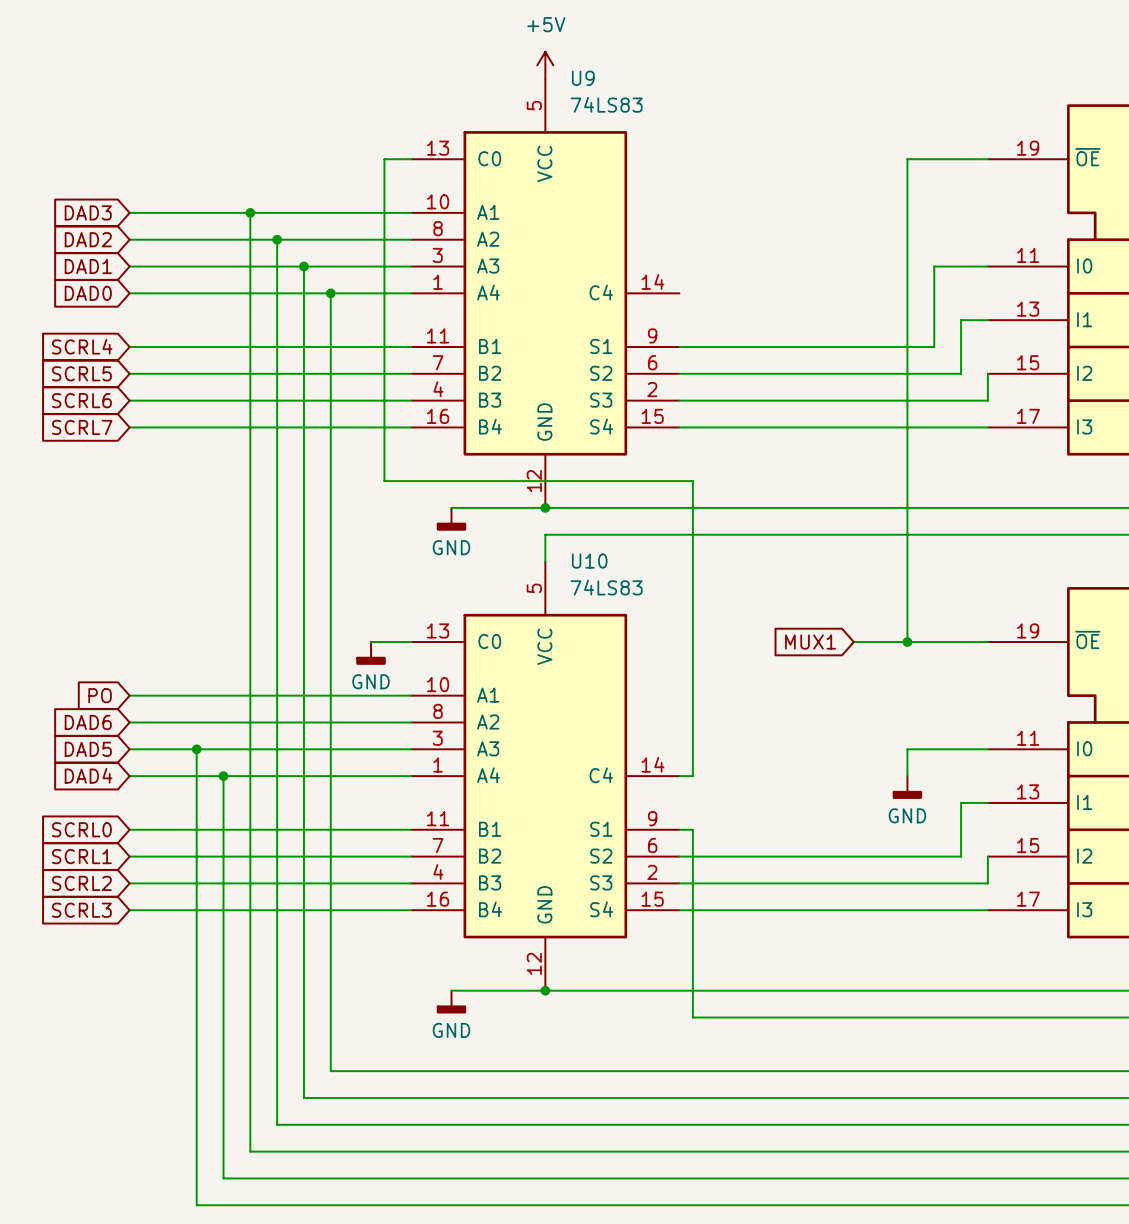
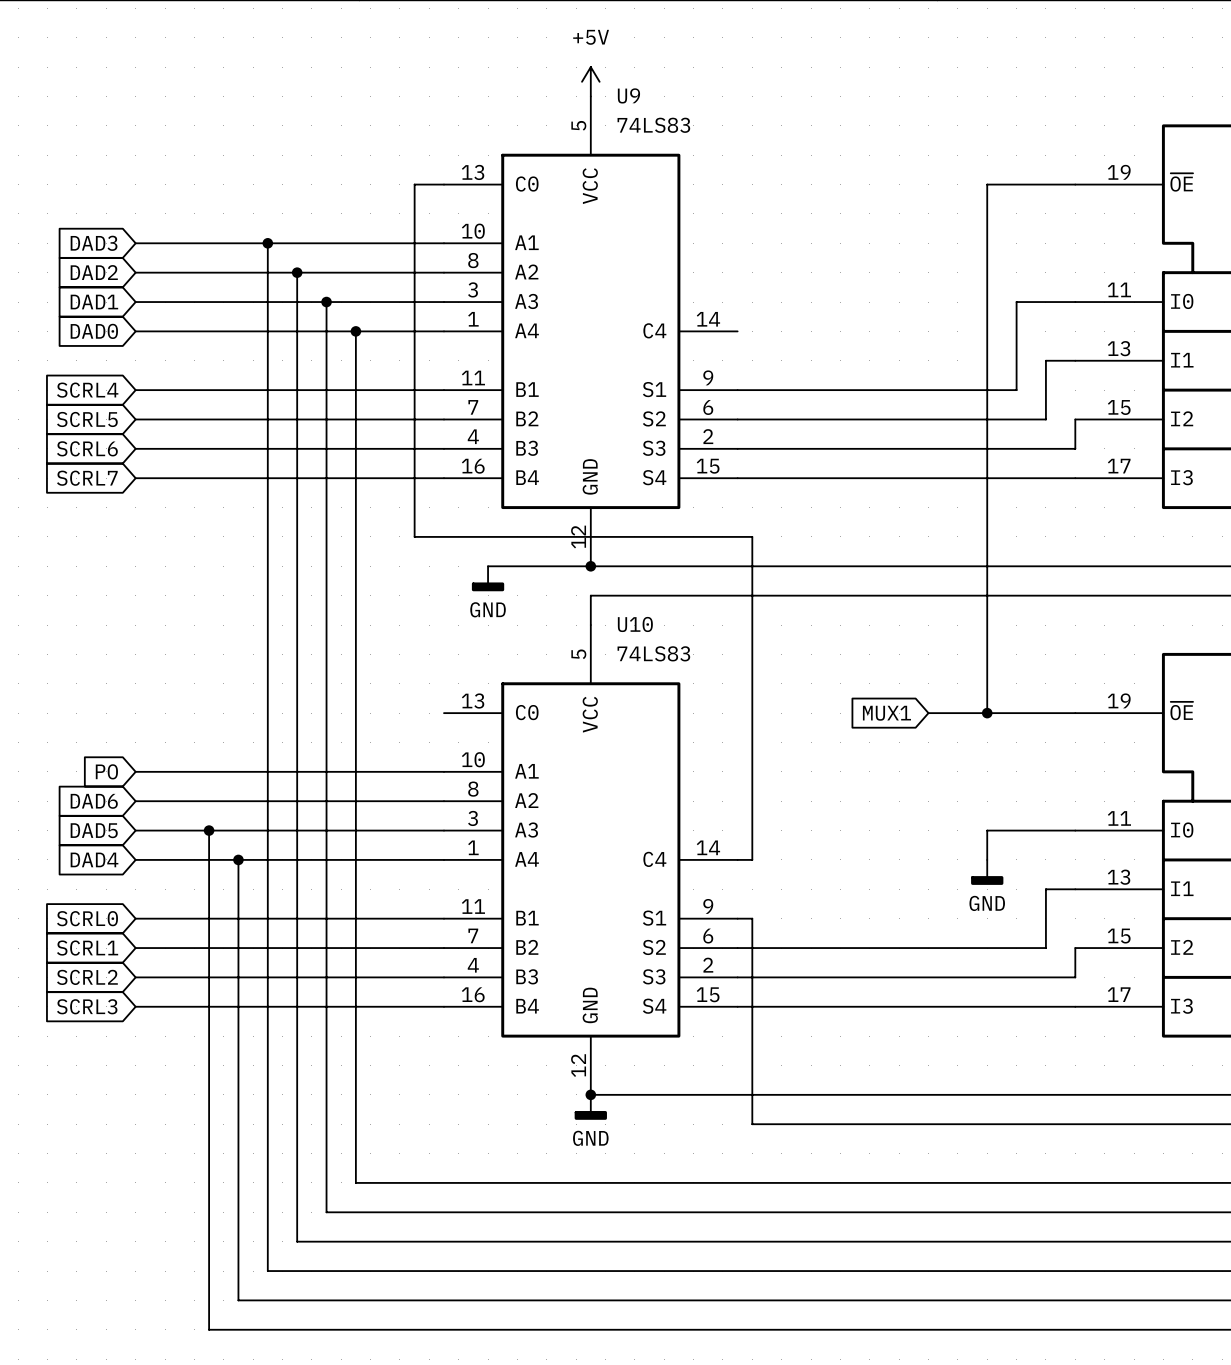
wire: (371, 642) (411, 642) -> none
power symbol: GND (371, 653) -> none
wire: (451, 990) (545, 990) -> none
power symbol position: GND (451, 1002) -> GND (590, 1107)

